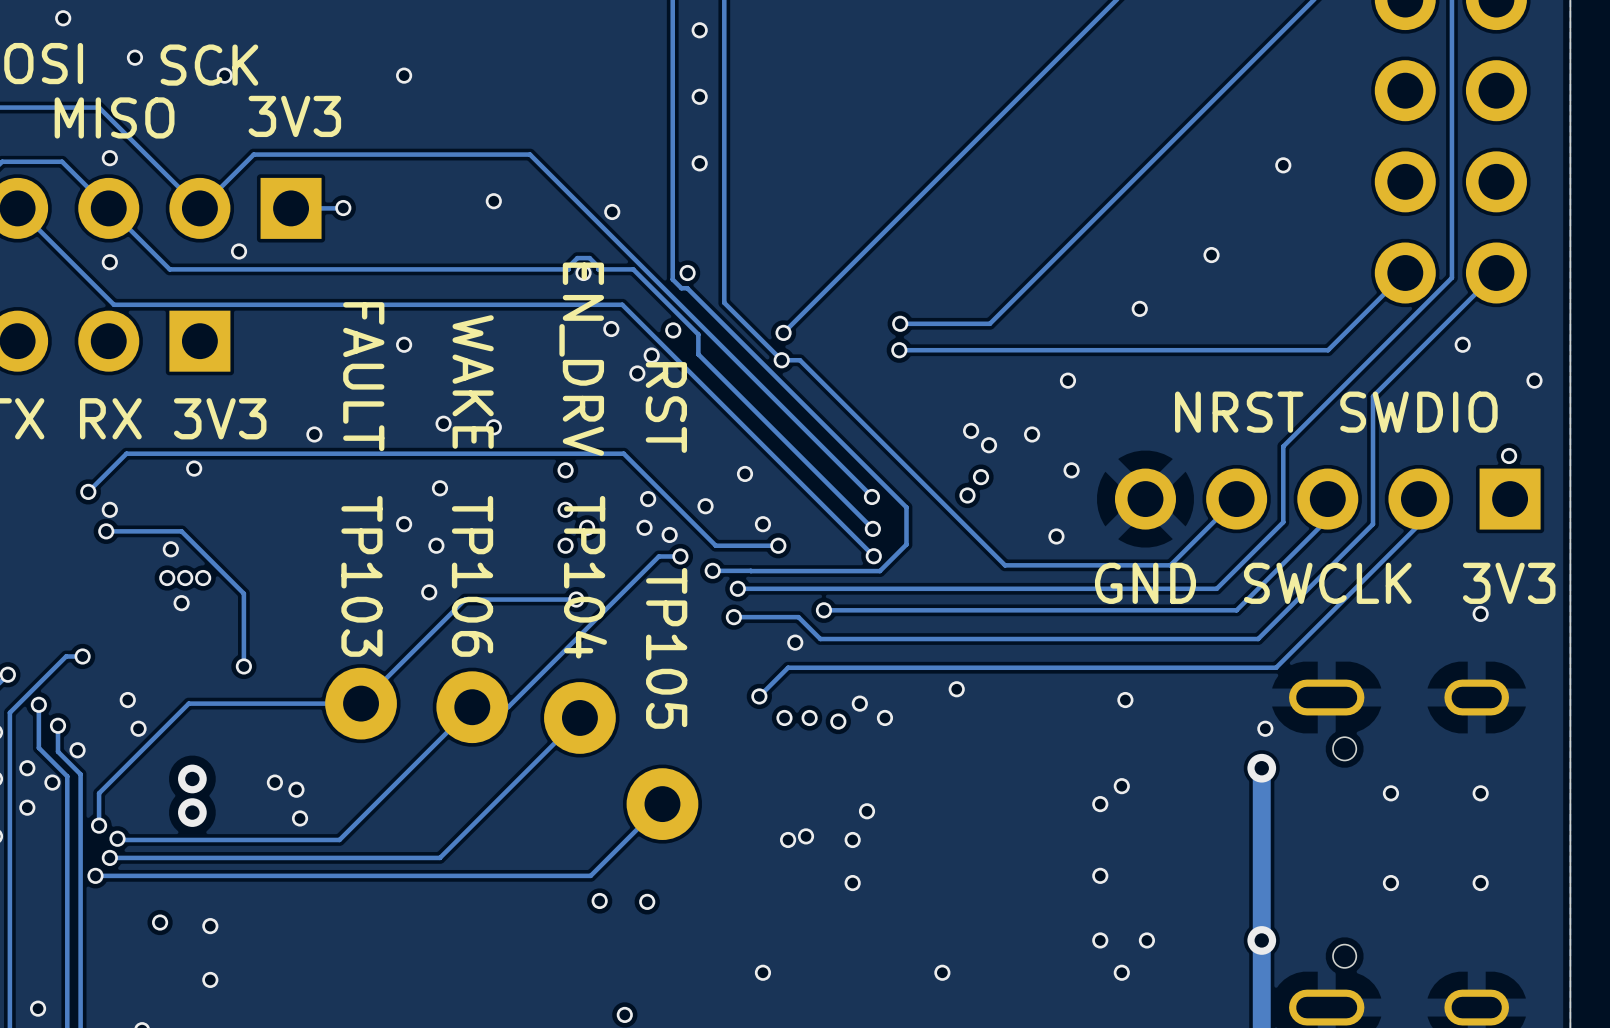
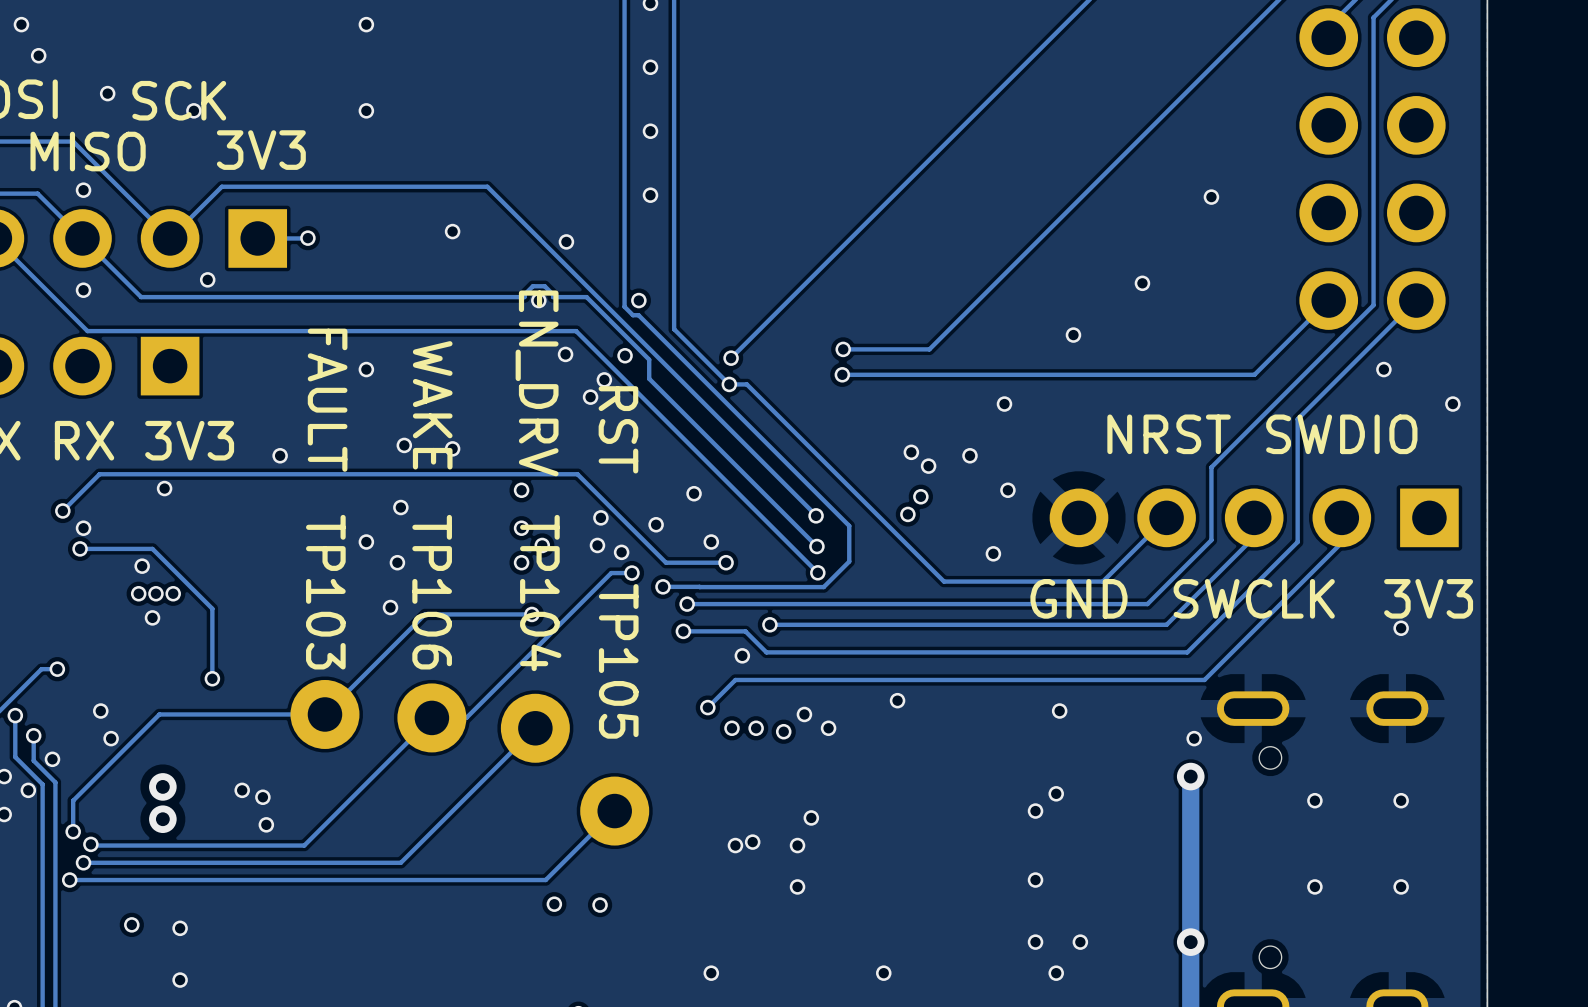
via: (1509, 455) -> none

